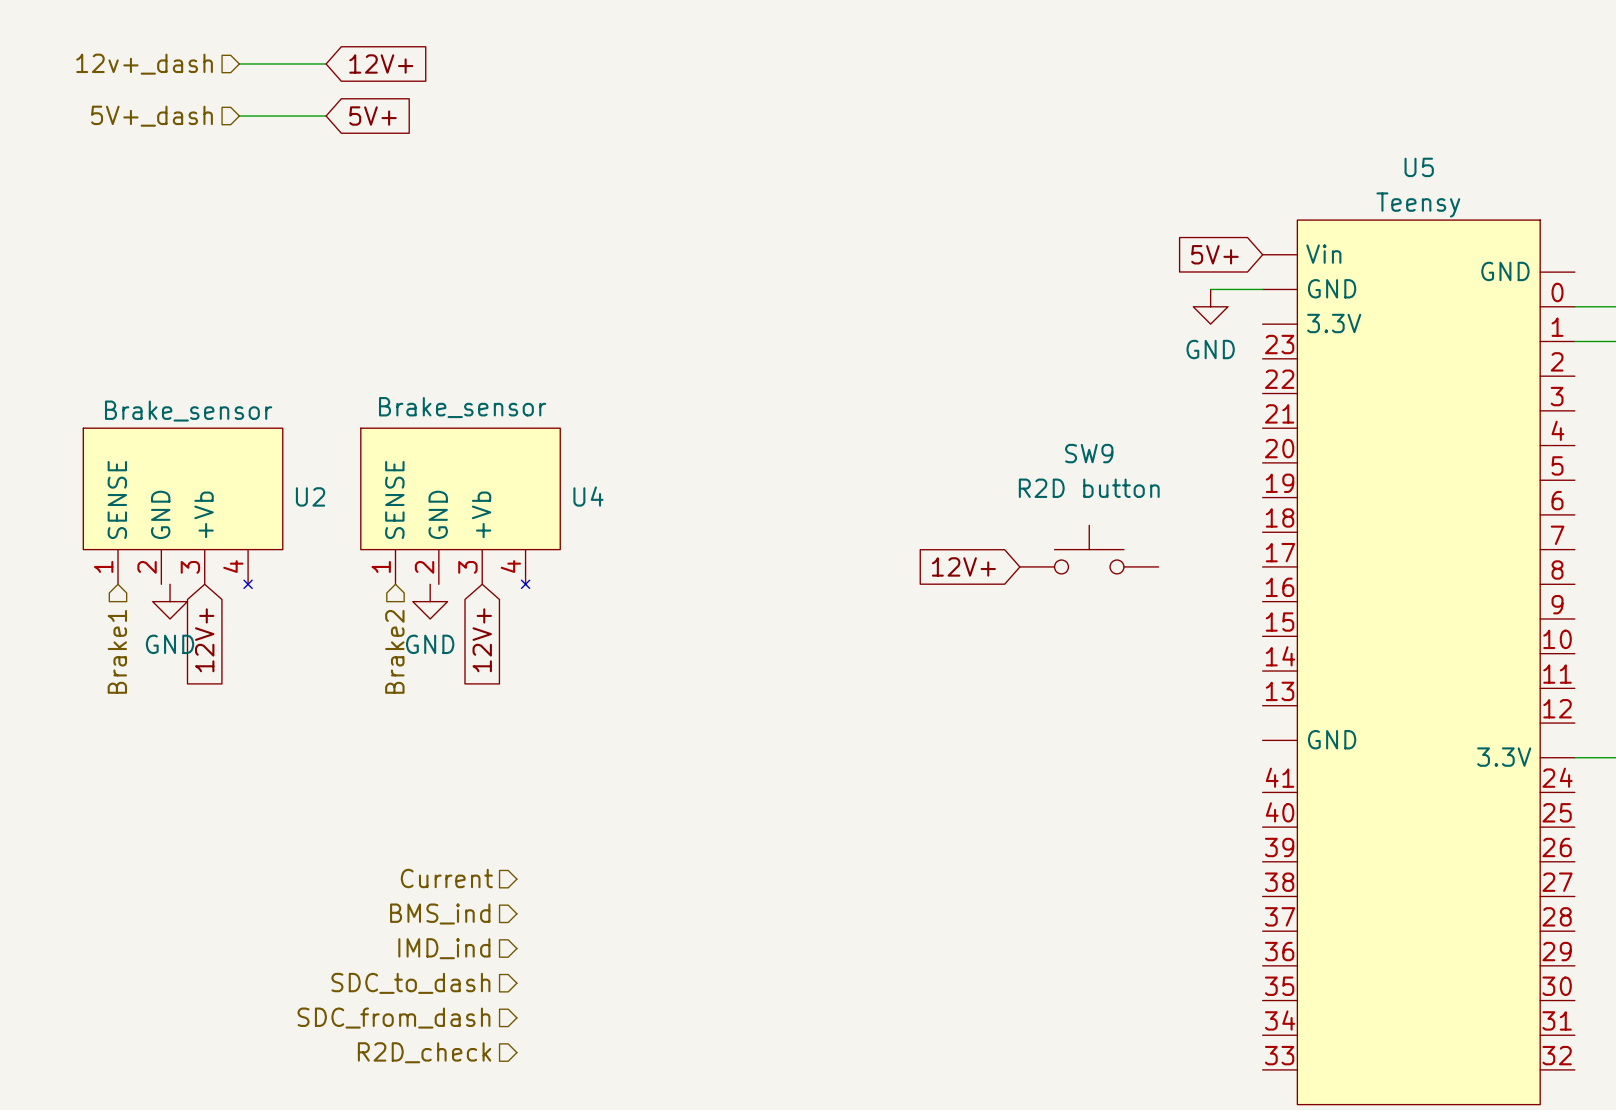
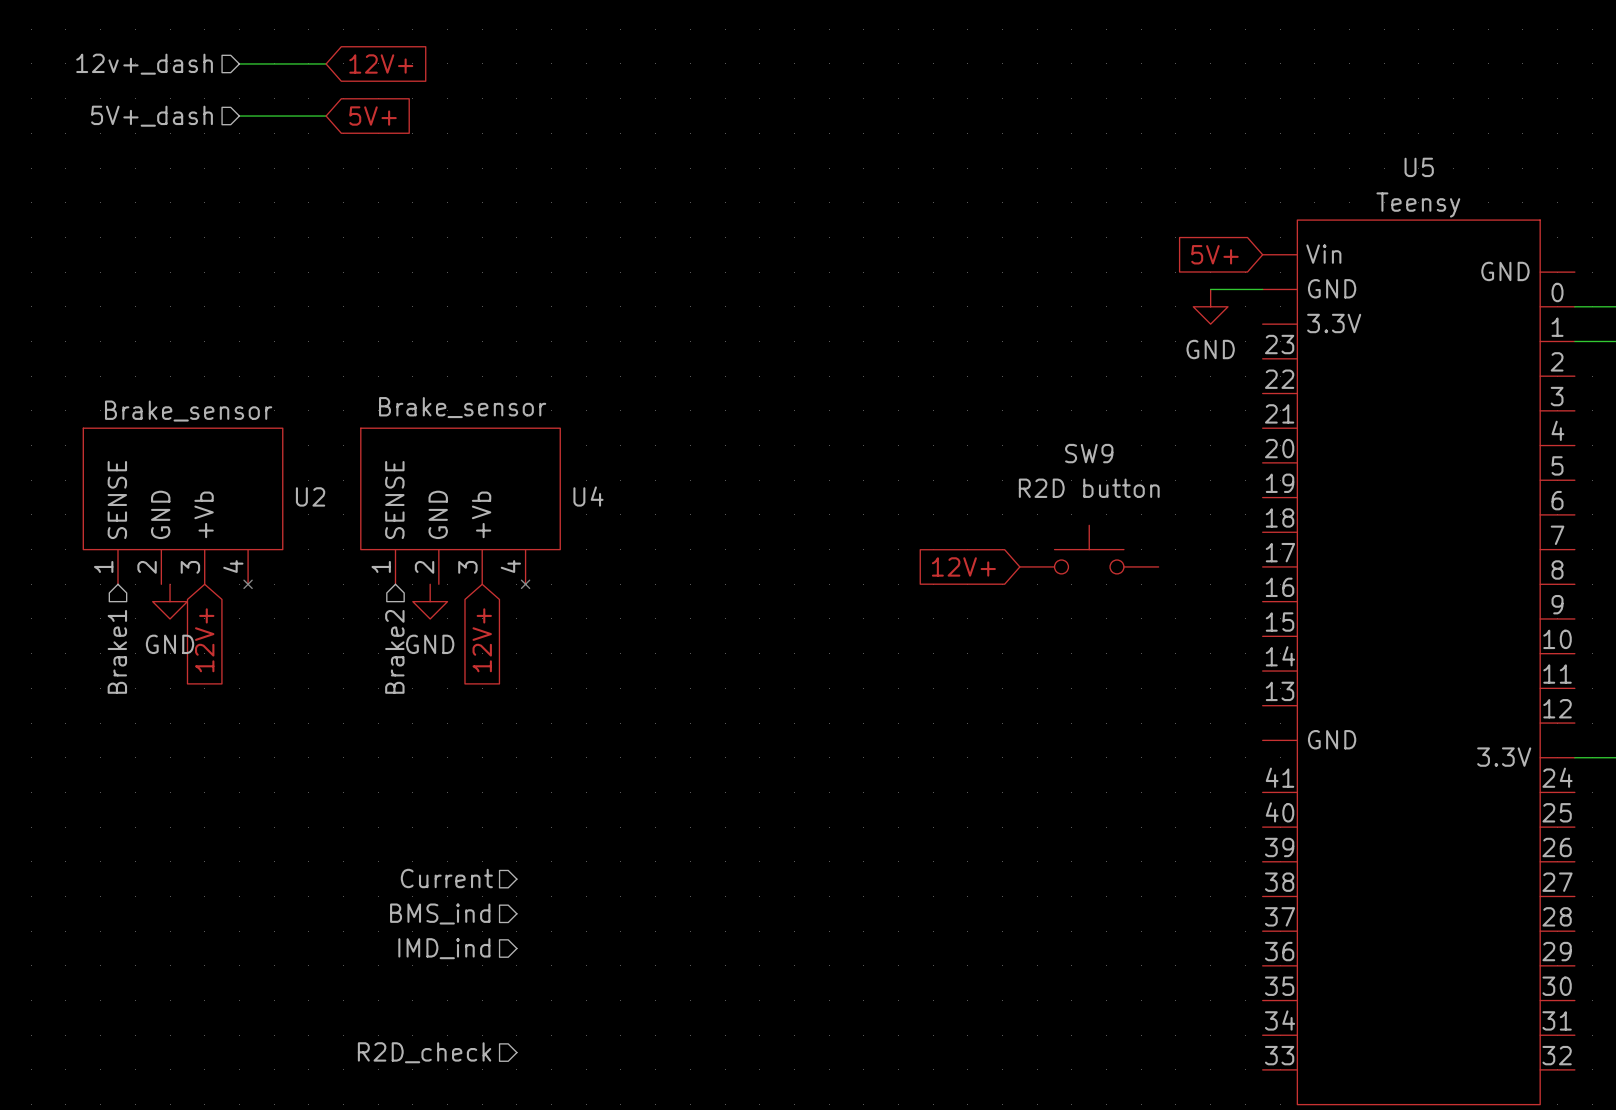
hierarchical label: SDC_to_dash (410, 983) -> none
hierarchical label: SDC_from_dash (393, 1018) -> none

